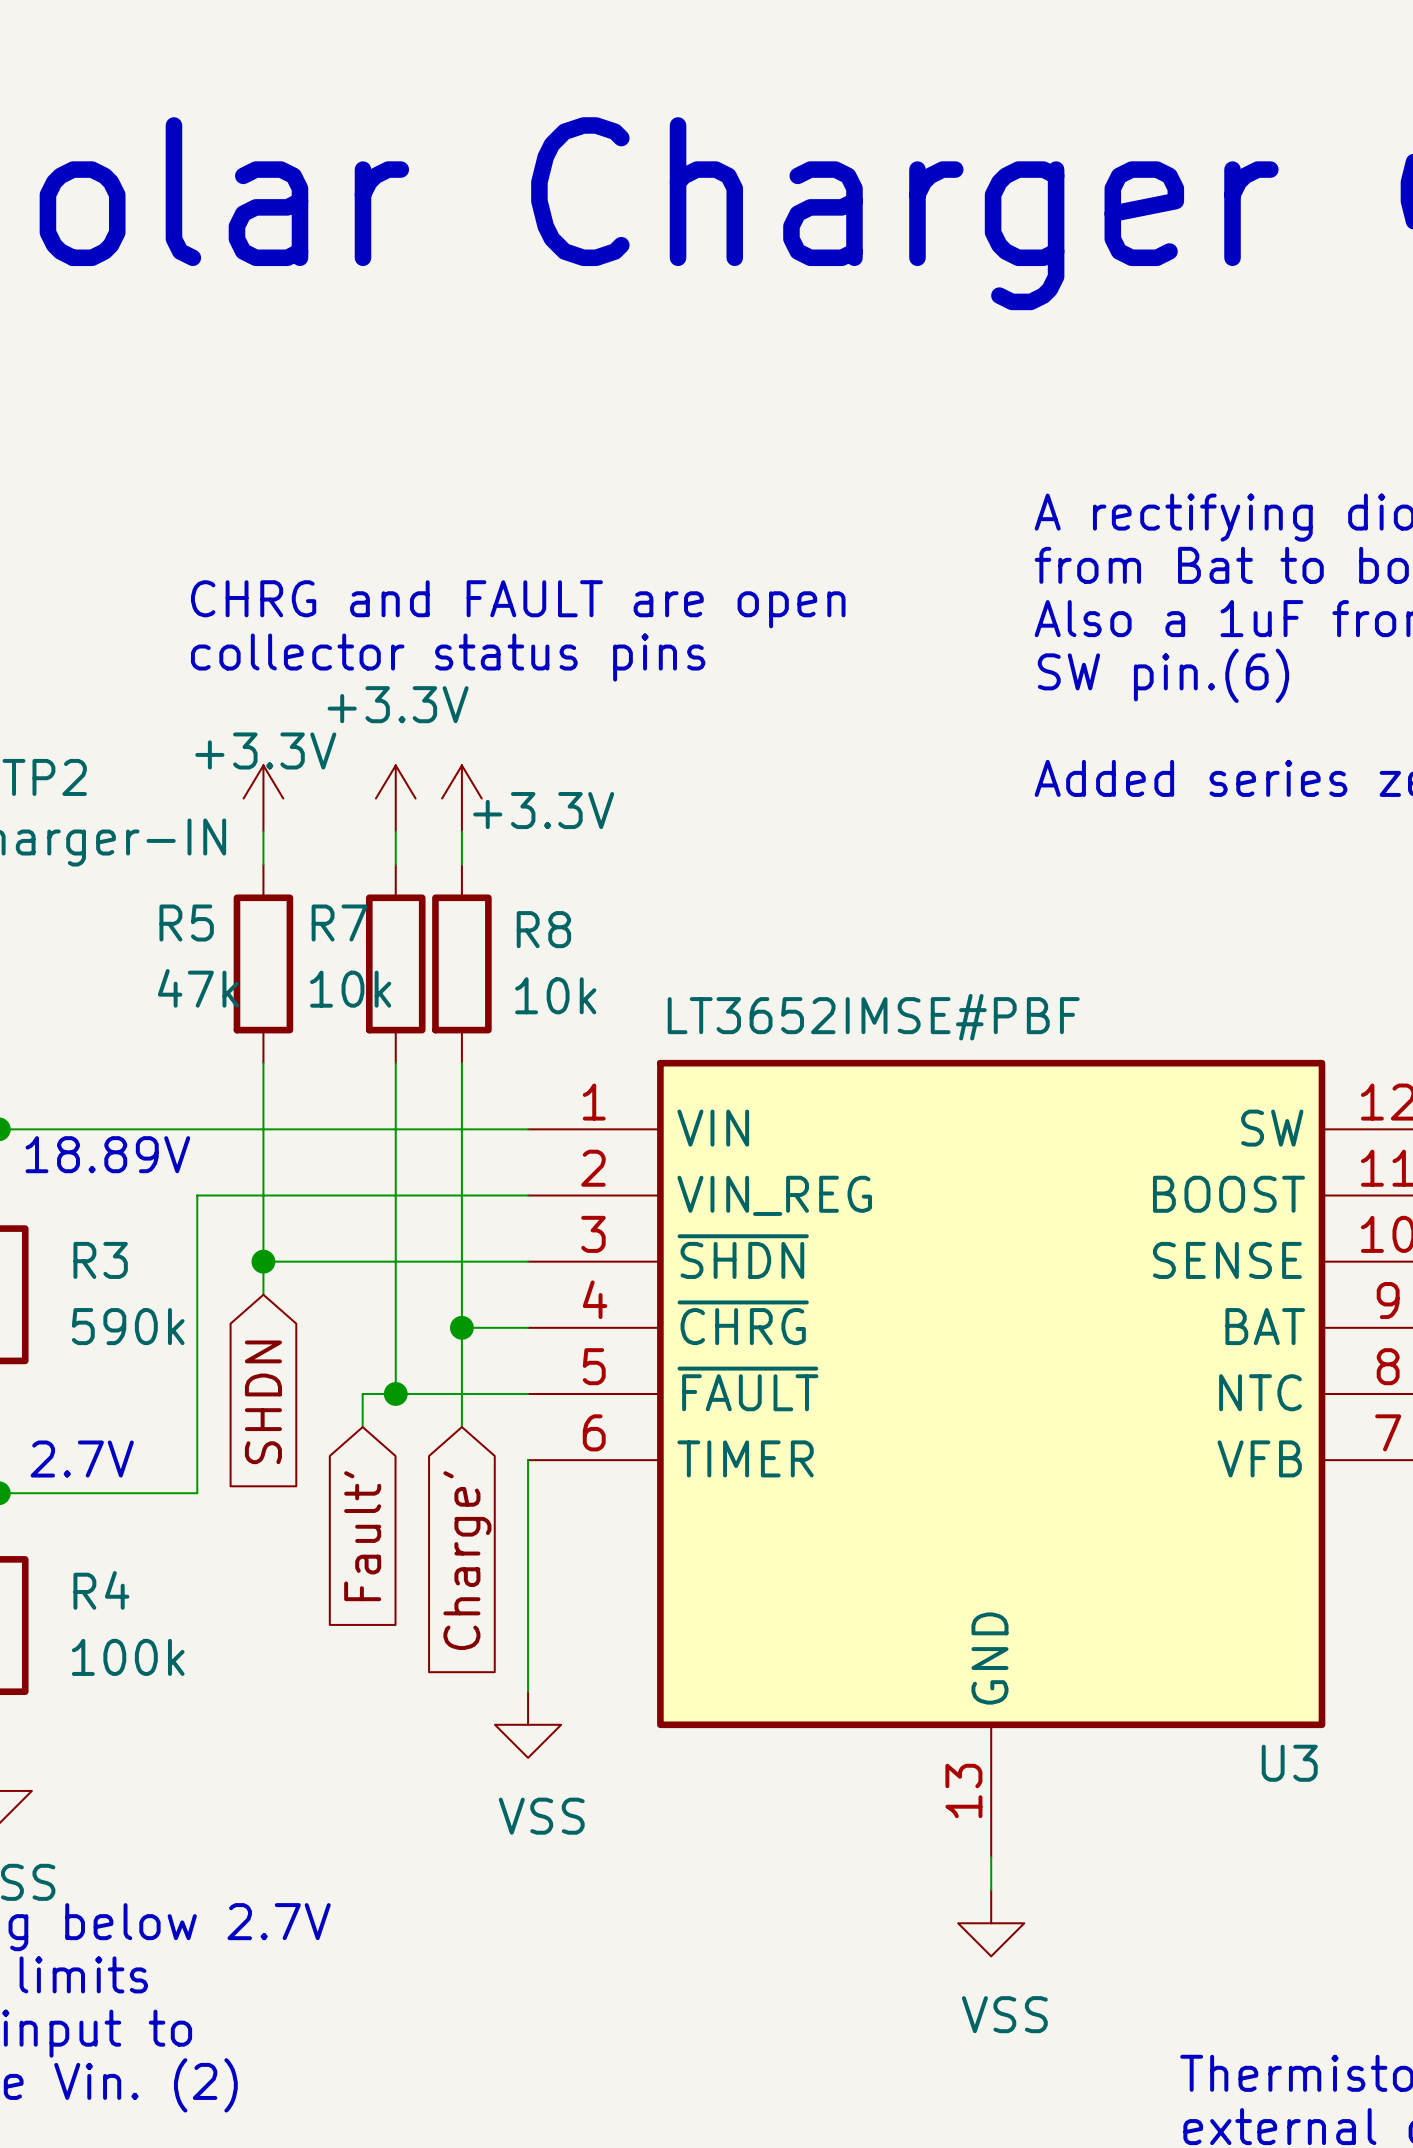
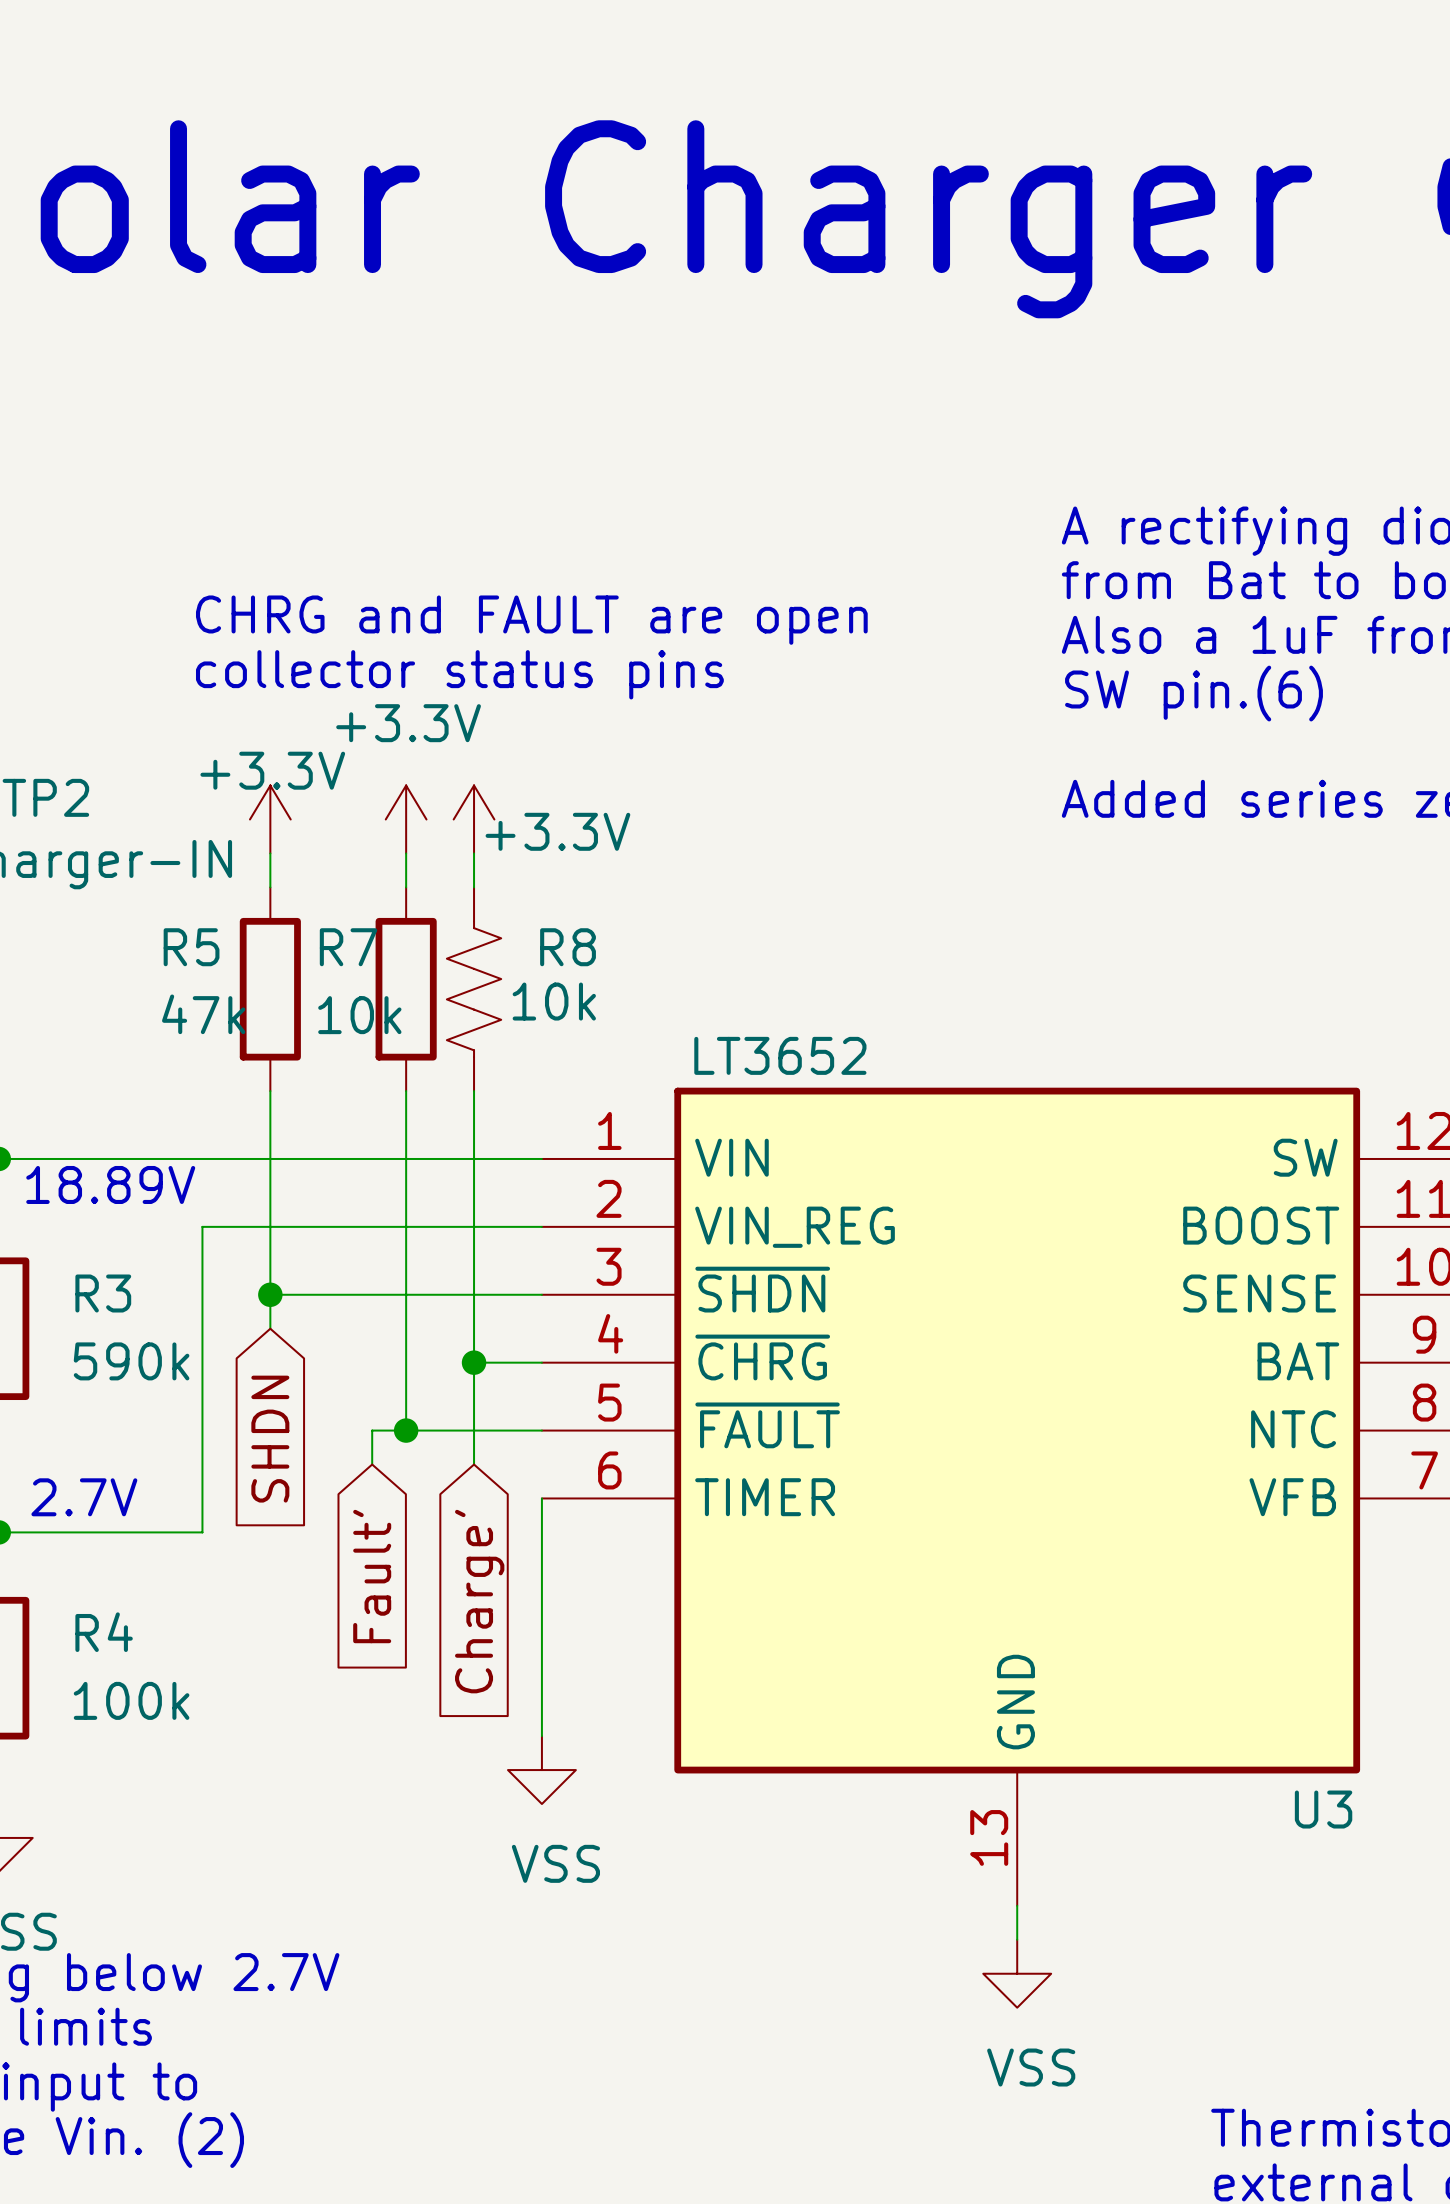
R8 symbol: [432, 864, 492, 1064] -> [446, 887, 502, 1092]
U3 value: LT3652IMSE#PBF (873, 1017) -> LT3652 (780, 1055)

